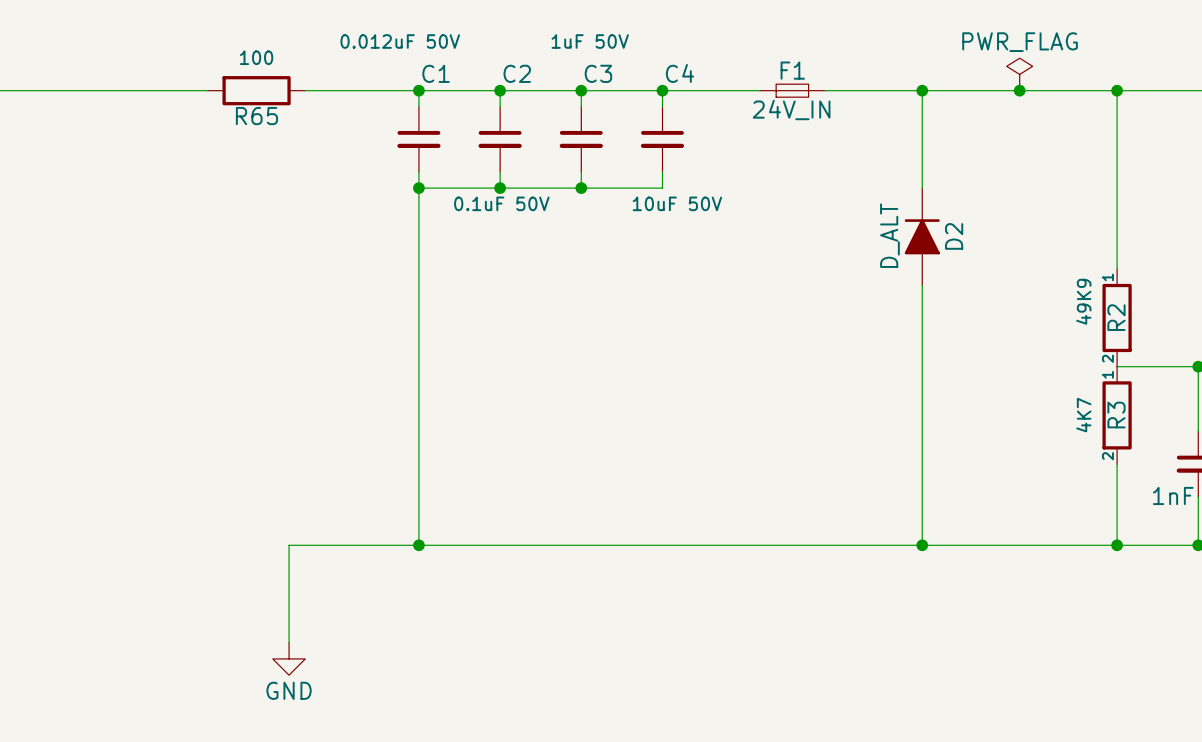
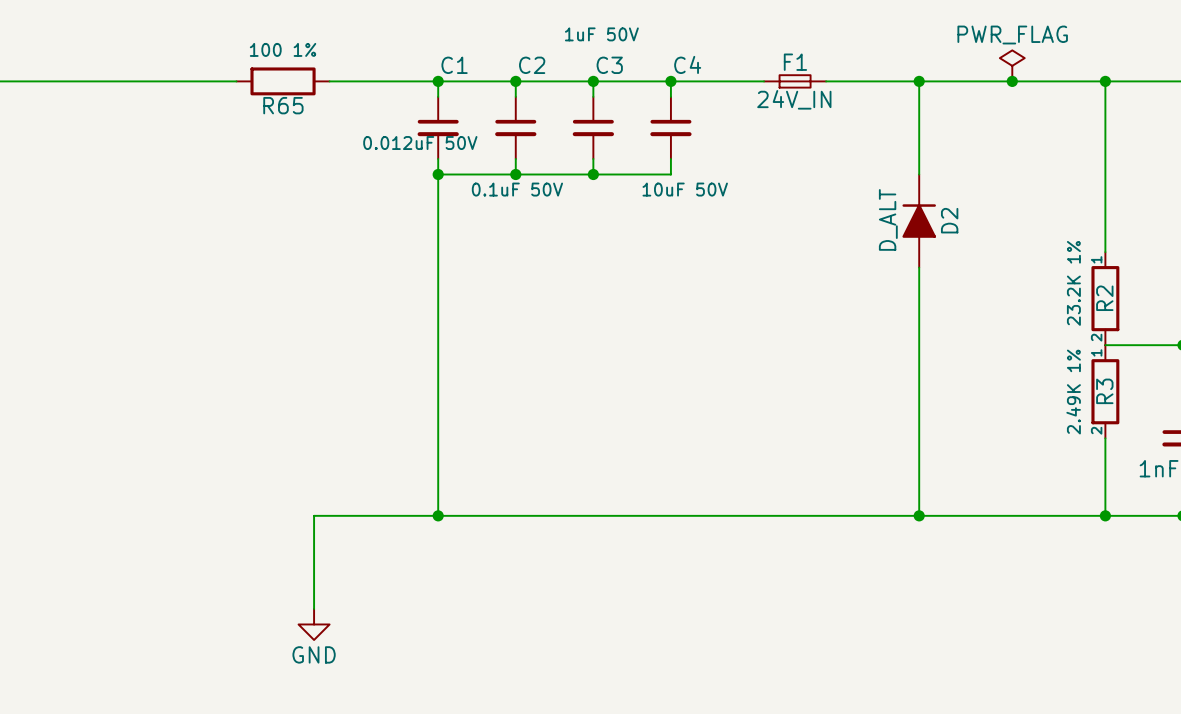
C1 value position: 0.012uF 50V (400, 41) -> 0.012uF 50V (420, 143)
R65 value: 100 (256, 57) -> 100 1% (283, 49)
R2 value: 49K9 (1083, 301) -> 23.2K 1% (1073, 283)
R3 value: 4K7 (1083, 415) -> 2.49K 1% (1073, 392)

